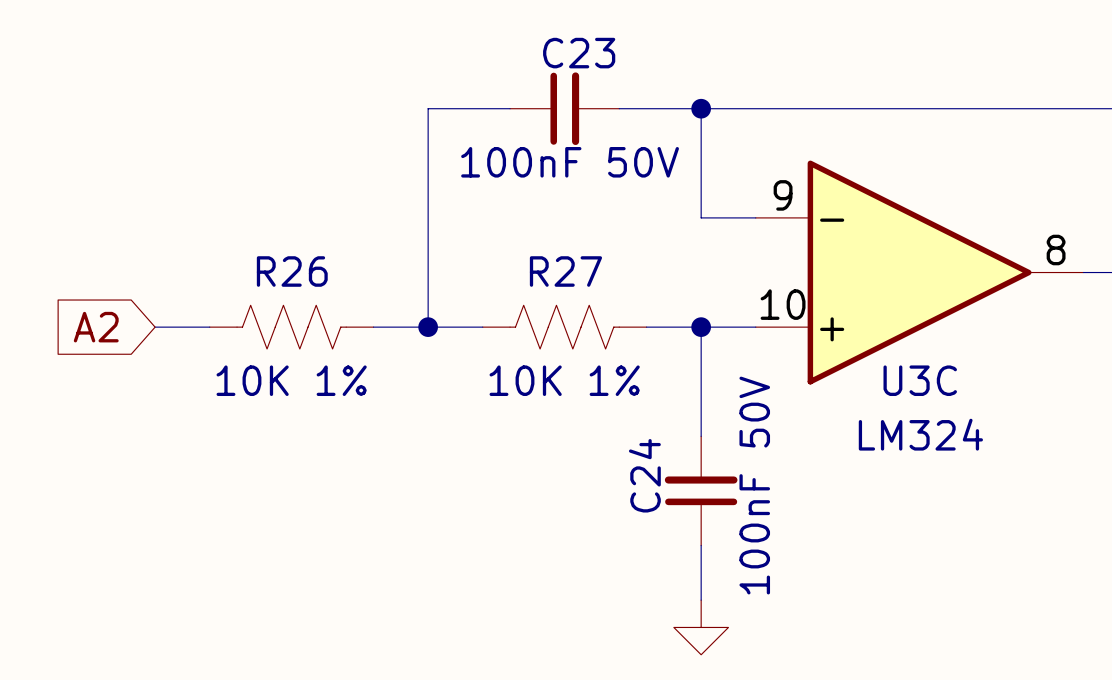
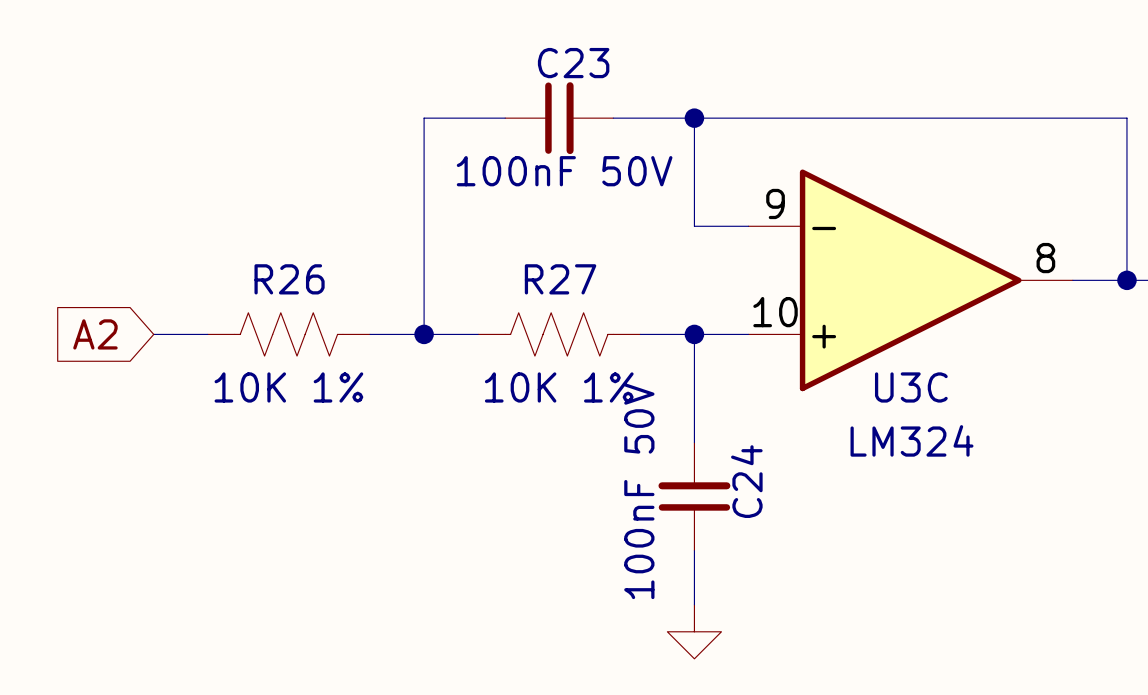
C24 name position: C24 (644, 475) -> C24 (746, 481)
C24 value position: 100nF 50V (754, 485) -> 100nF 50V (639, 491)

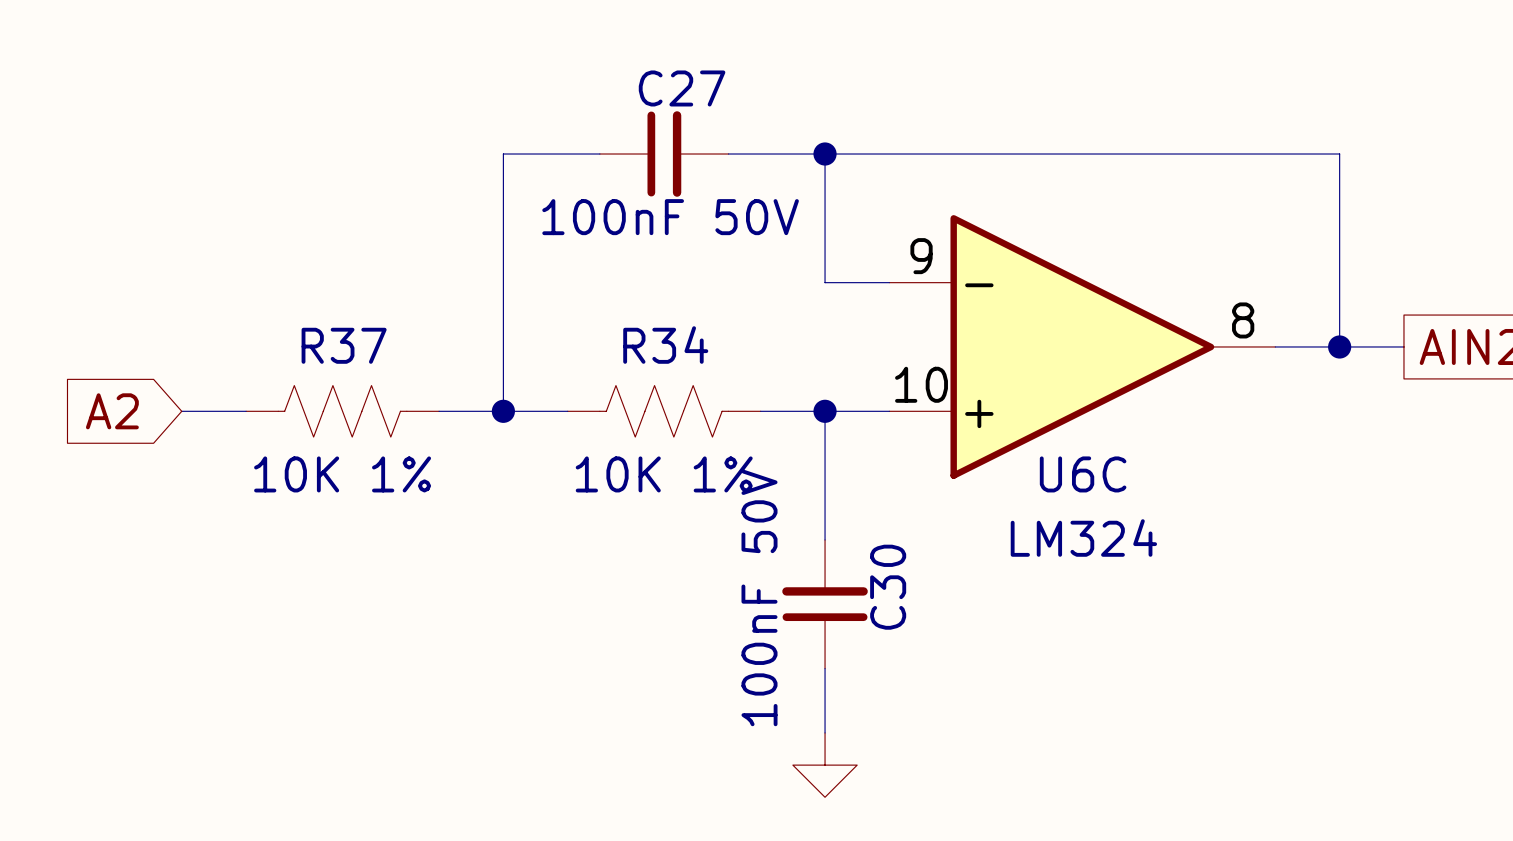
C23 name: C23 (573, 63) -> C27 (682, 88)
R26 name: R26 (289, 279) -> R37 (344, 345)
R27 name: R27 (560, 279) -> R34 (665, 345)
U3C name: U3C (911, 387) -> U6C (1083, 474)
C24 name: C24 (746, 481) -> C30 (888, 587)

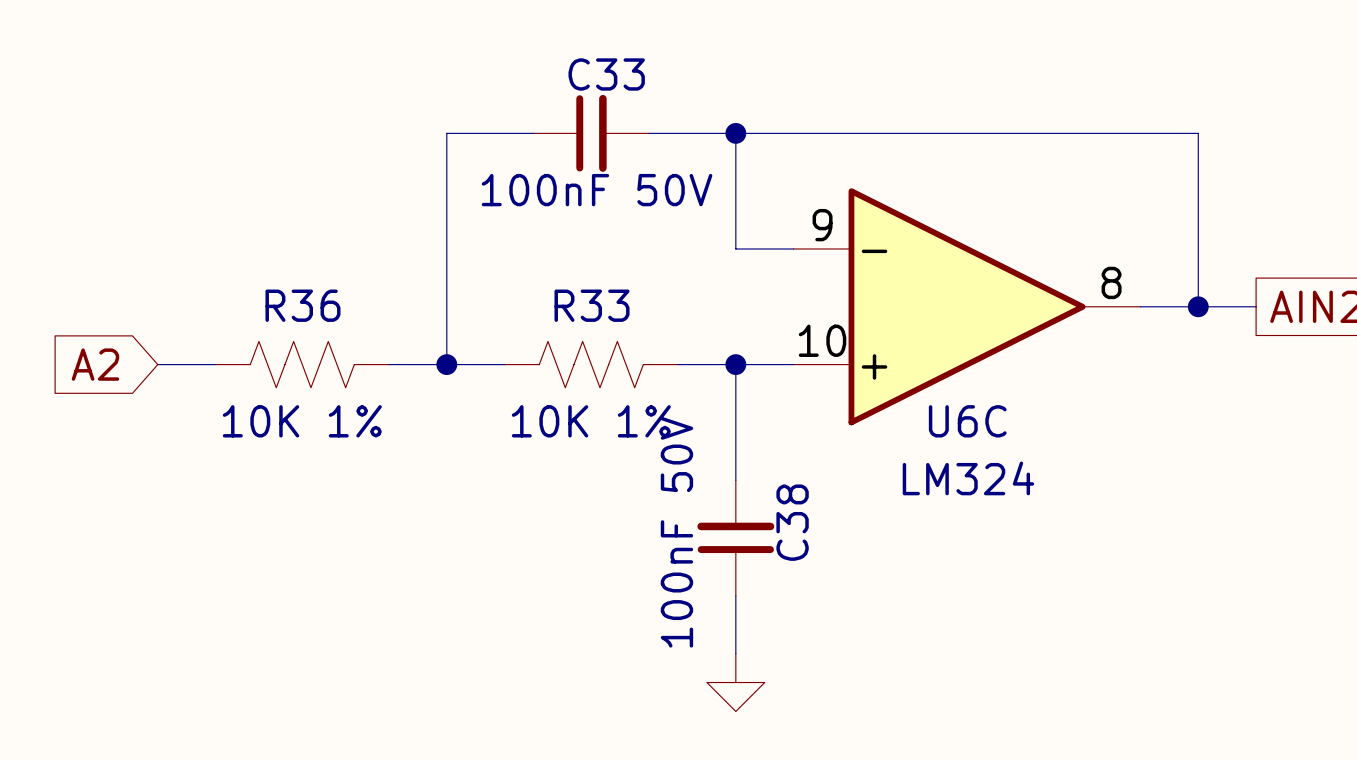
C27 name: C27 (682, 88) -> C33 (606, 74)
R37 name: R37 (344, 345) -> R36 (302, 305)
R34 name: R34 (665, 345) -> R33 (592, 305)
C30 name: C30 (888, 587) -> C38 (792, 522)

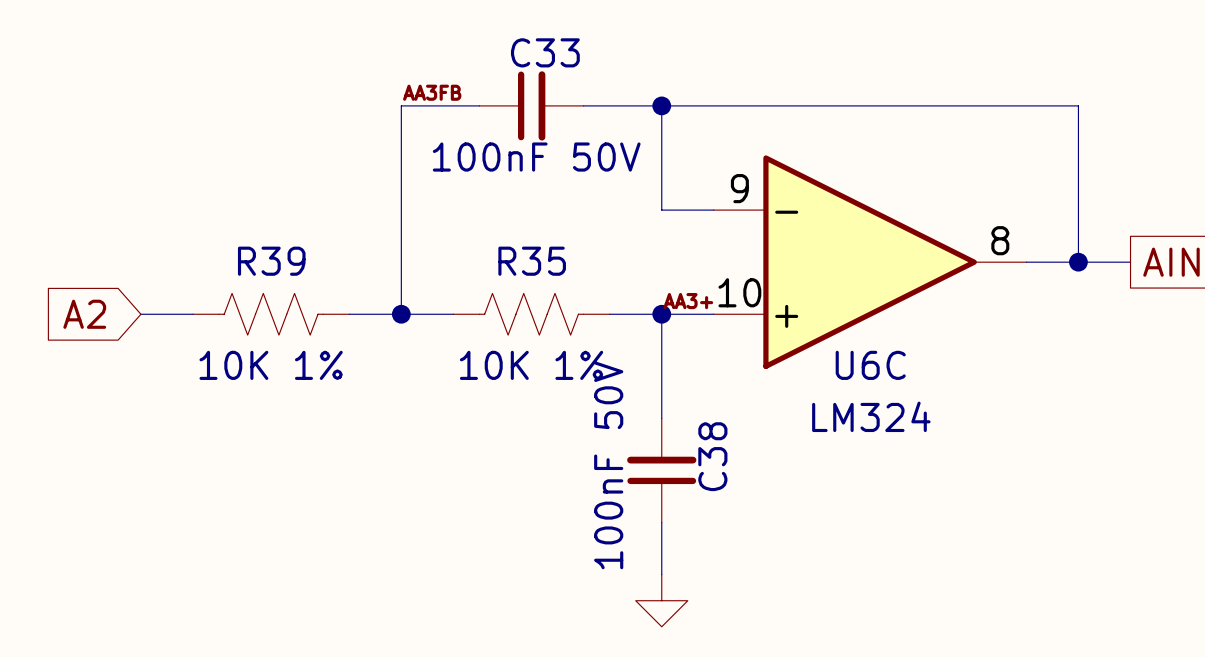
label: none -> AA3FB (432, 92)
R36 name: R36 (302, 305) -> R39 (271, 261)
R33 name: R33 (592, 305) -> R35 (532, 261)
label: none -> AA3+ (688, 301)

